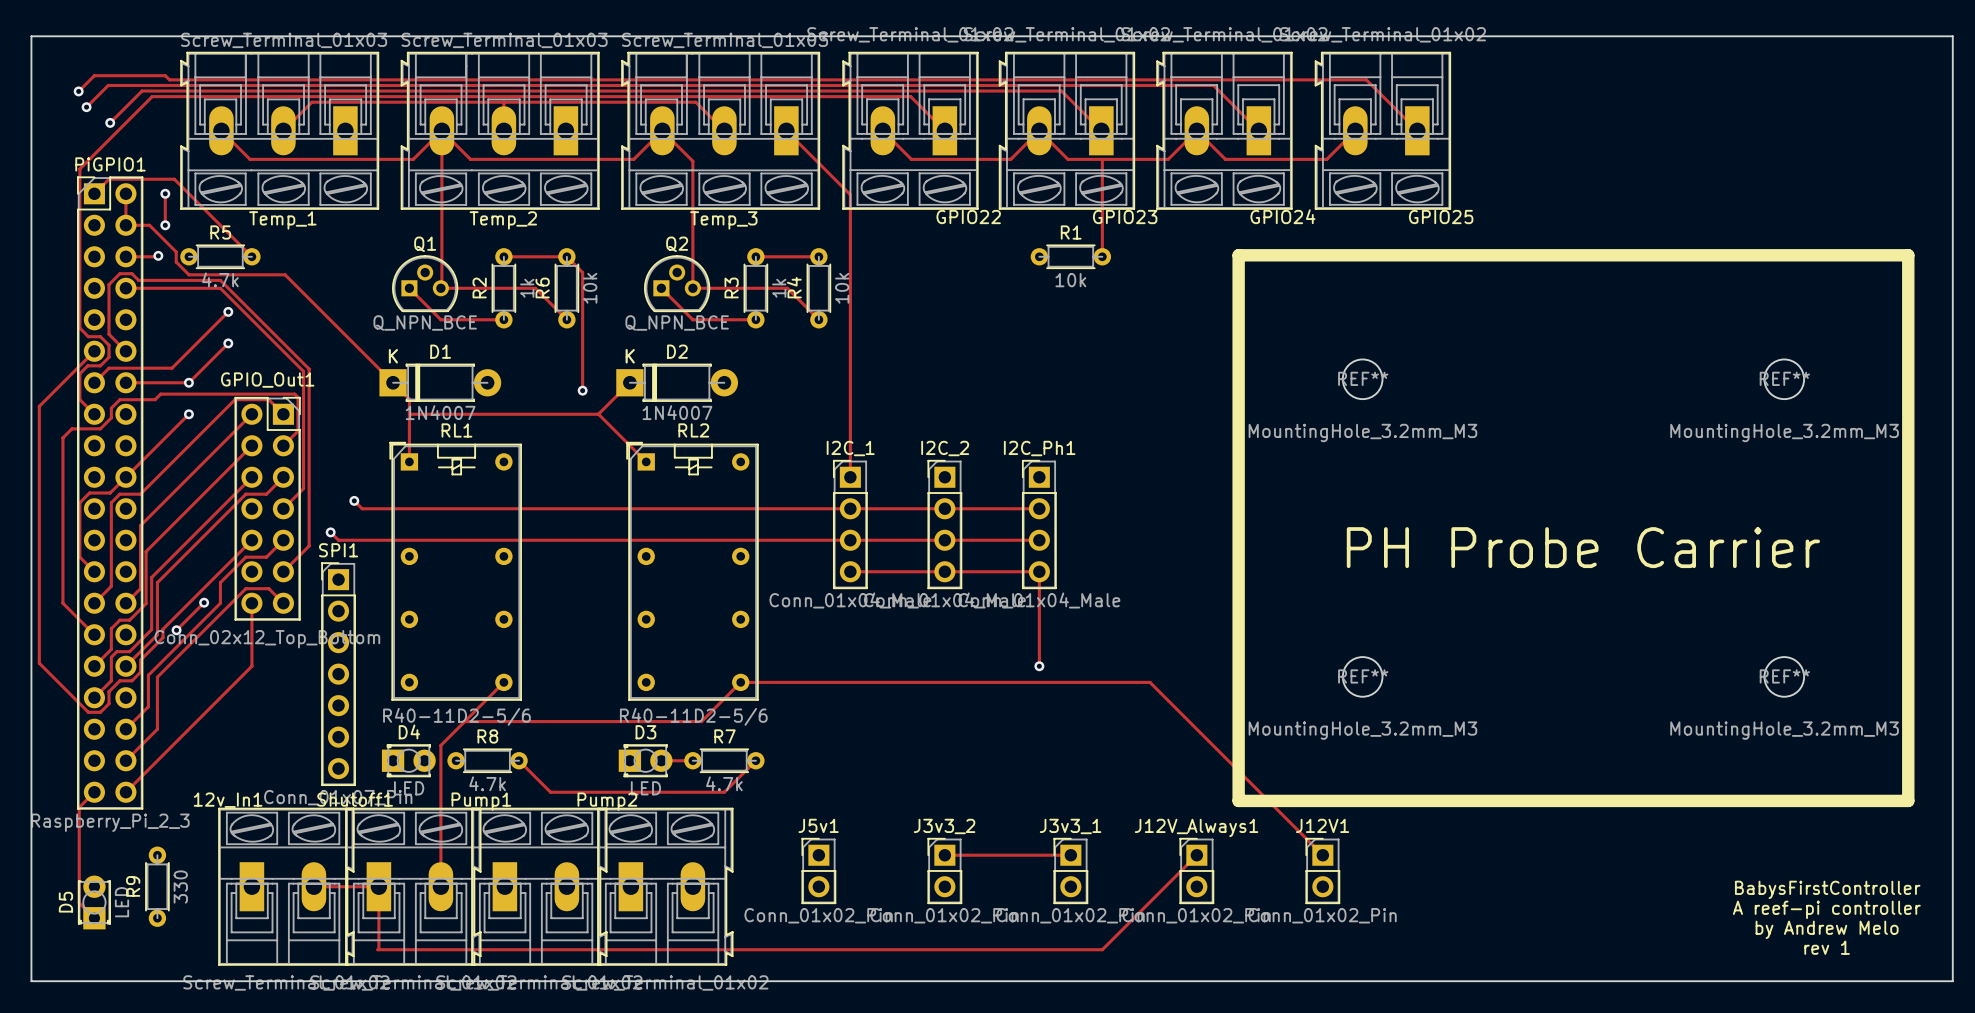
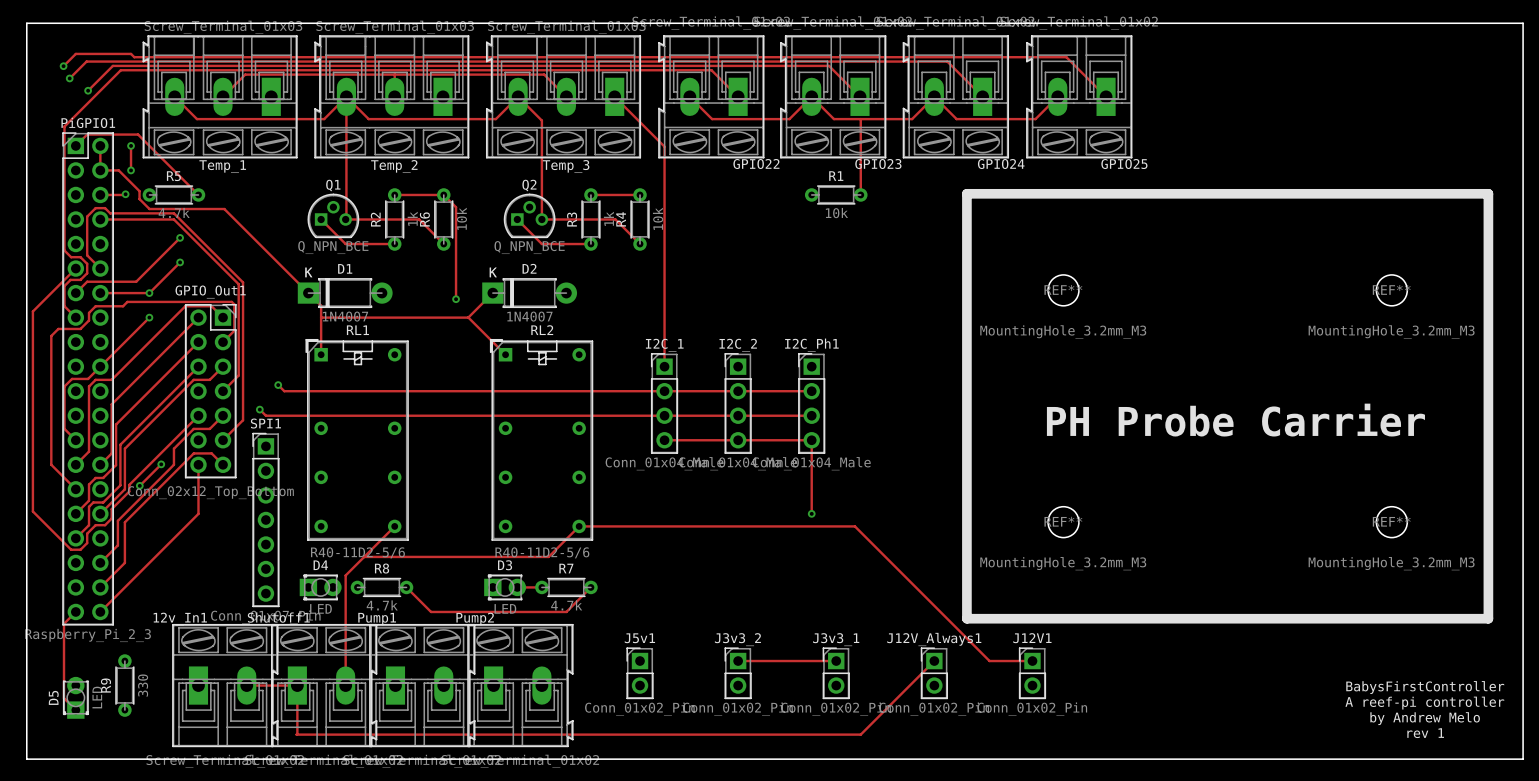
track: (1094, 682) (1150, 682) (1322, 855) -> (854, 526) (989, 661) (1032, 661)

